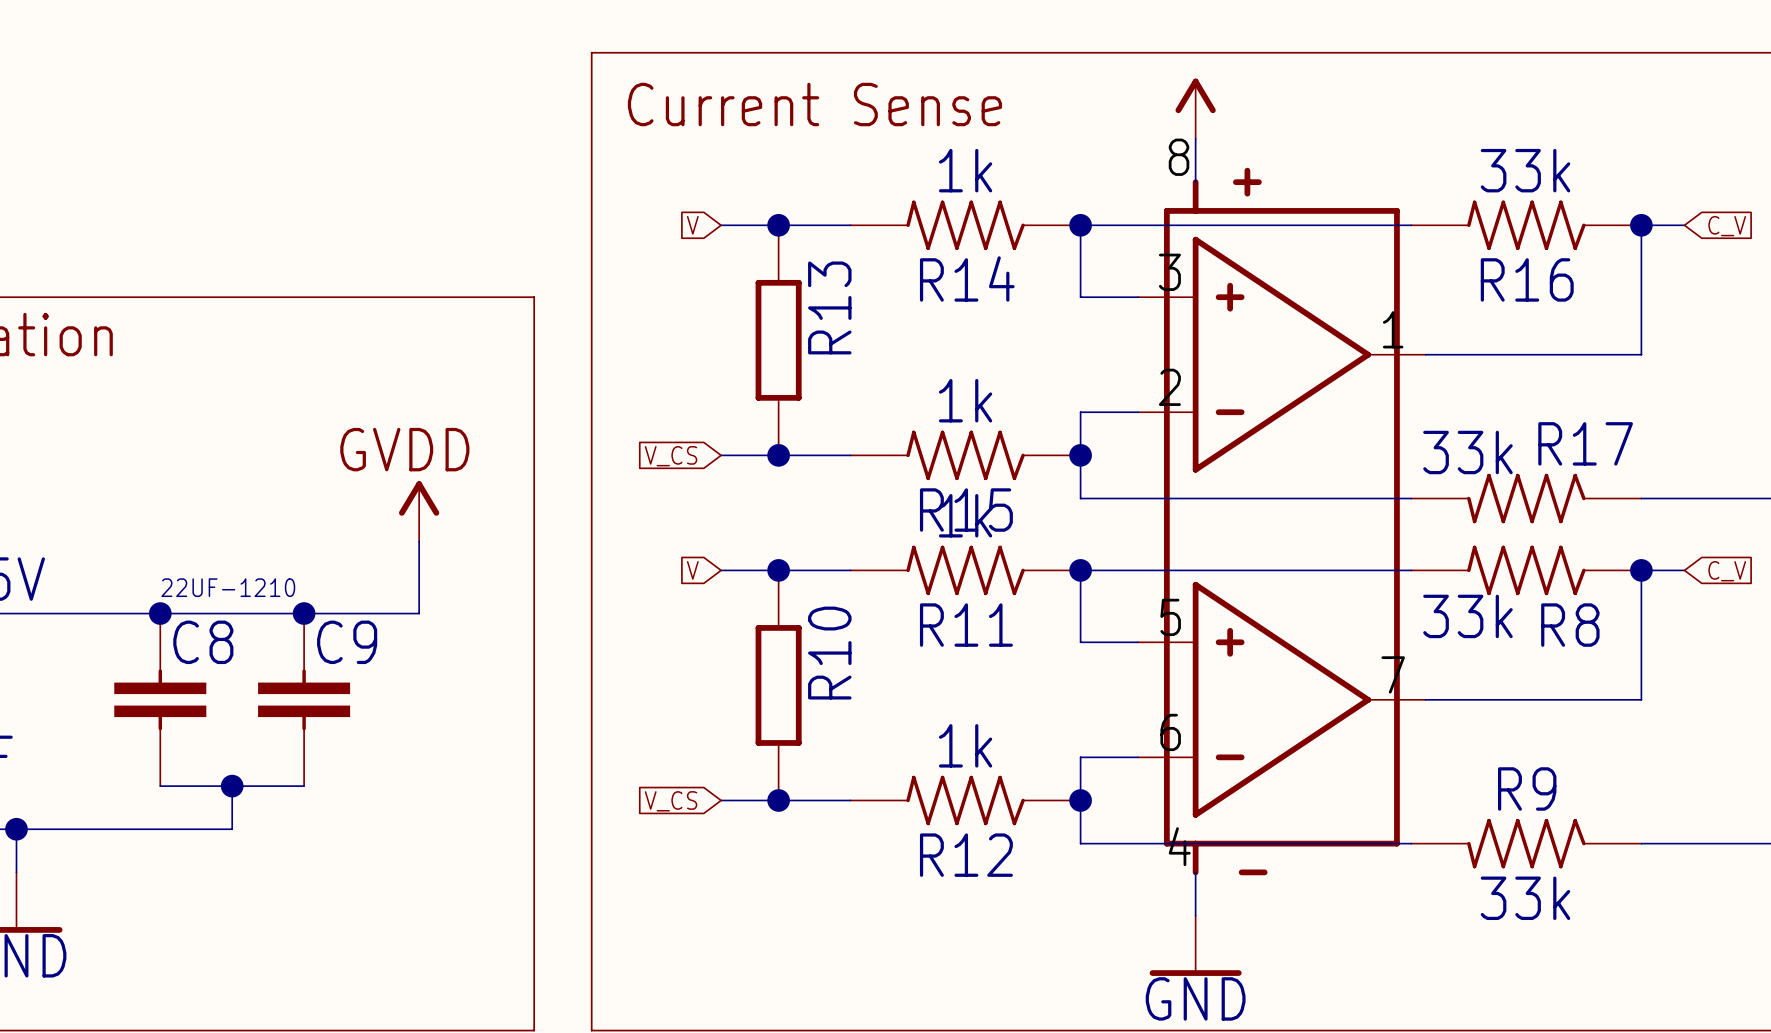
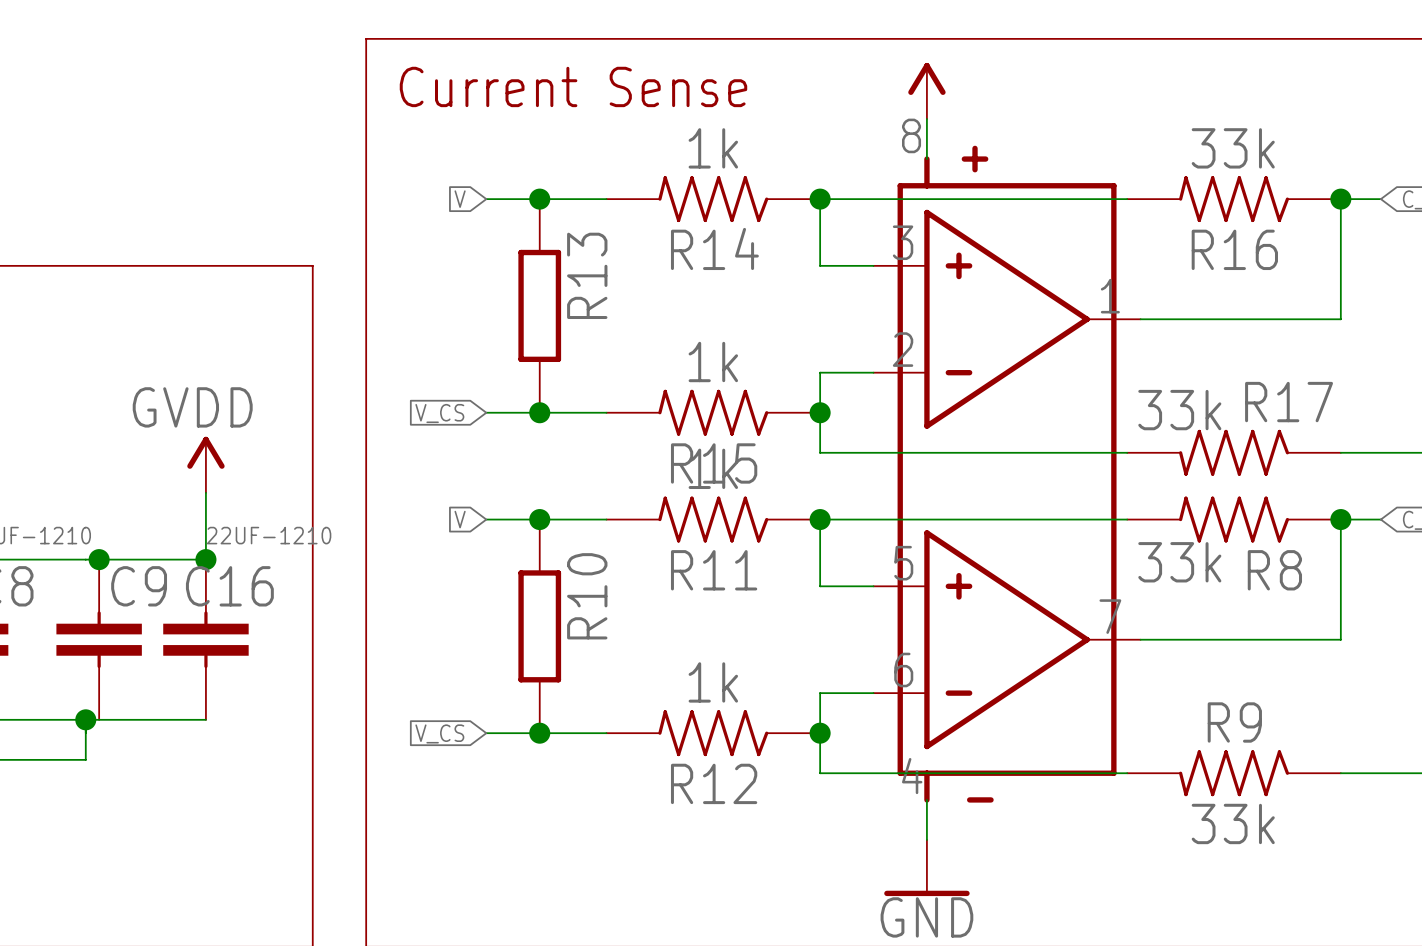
junction: none -> (205, 559)
C16: none -> 22UF-1210 (205, 639)
wire: (232, 786) (232, 829) -> (85, 719) (85, 759) (32, 759)
junction position: (232, 786) -> (85, 719)
wire: none -> (99, 719) (205, 719)

